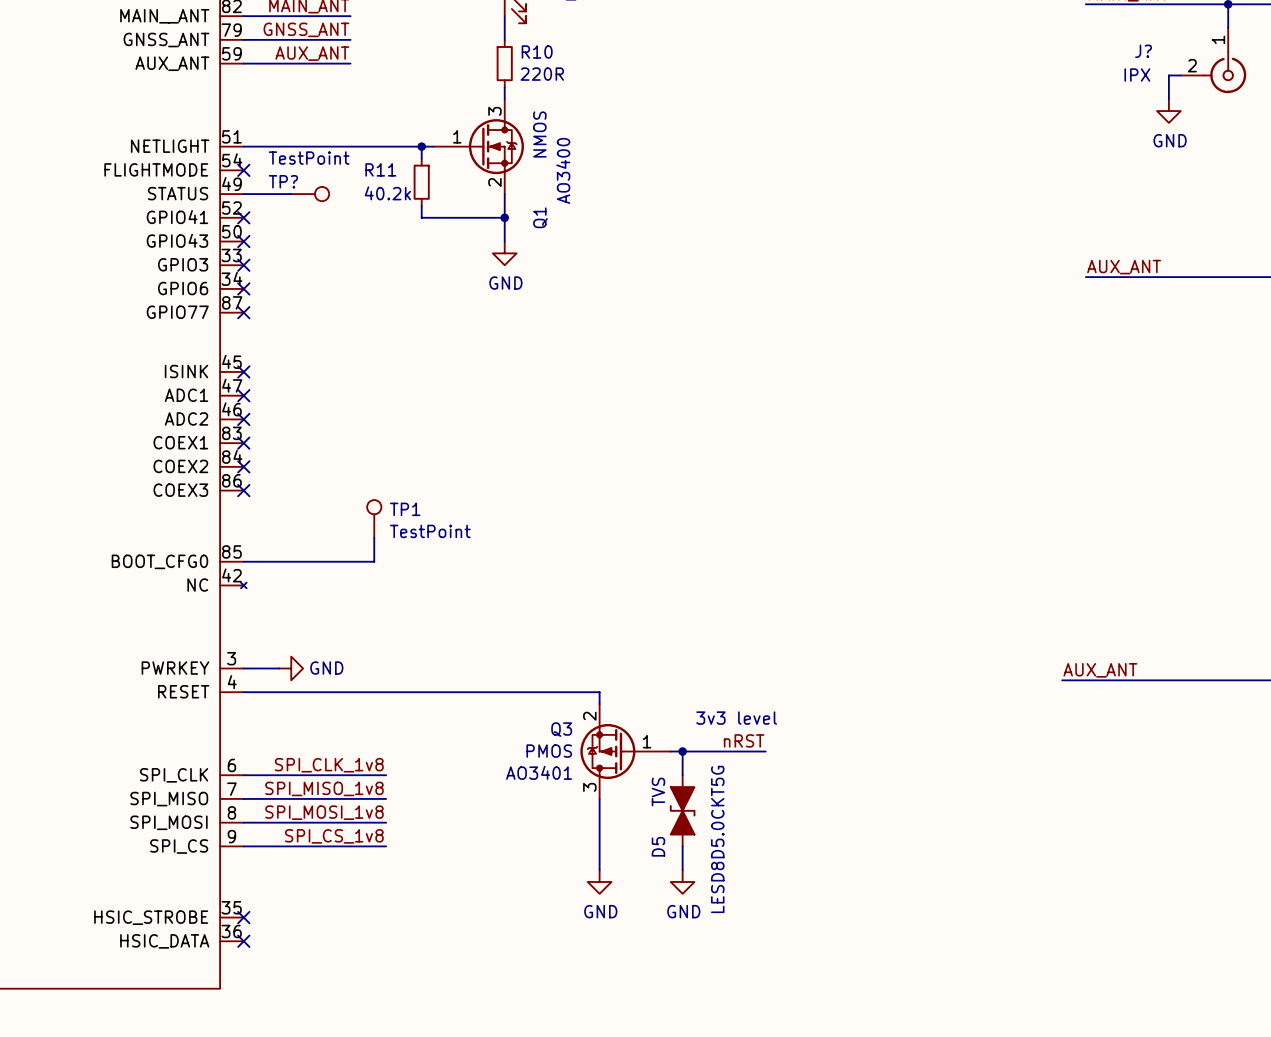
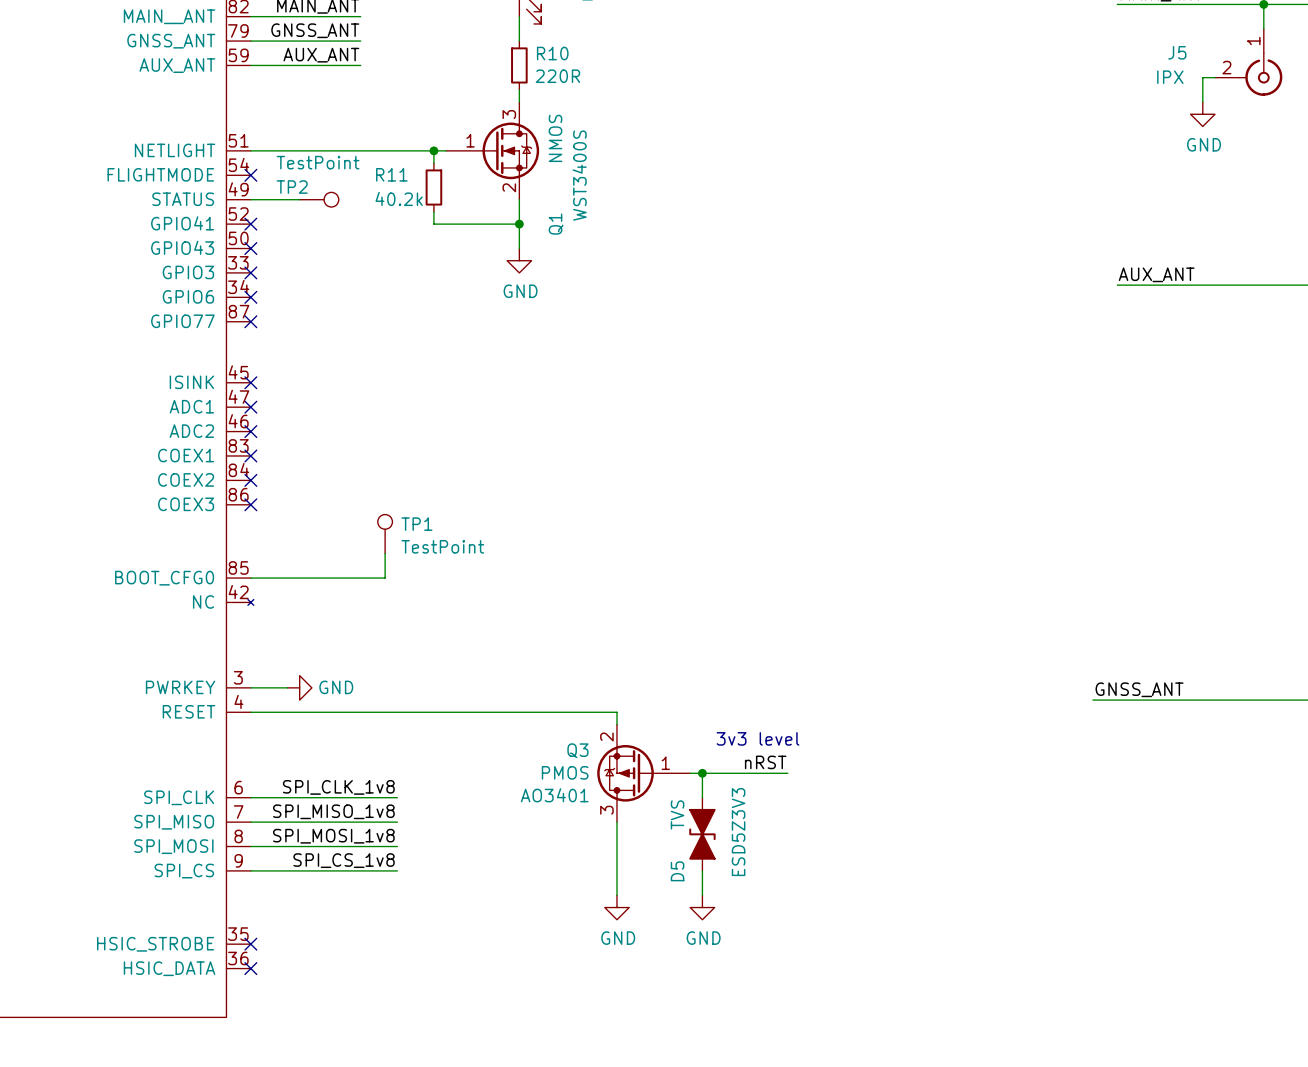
J? name: J? (1143, 51) -> J5 (1177, 52)
Q1 text: AO3400 (563, 170) -> WST3400S (579, 175)
TP? name: TP? (283, 181) -> TP2 (292, 187)
label: AUX_ANT (1100, 670) -> GNSS_ANT (1139, 689)
D5 text: LESD8D5.0CKT5G (717, 839) -> ESD5Z3V3 (738, 832)

